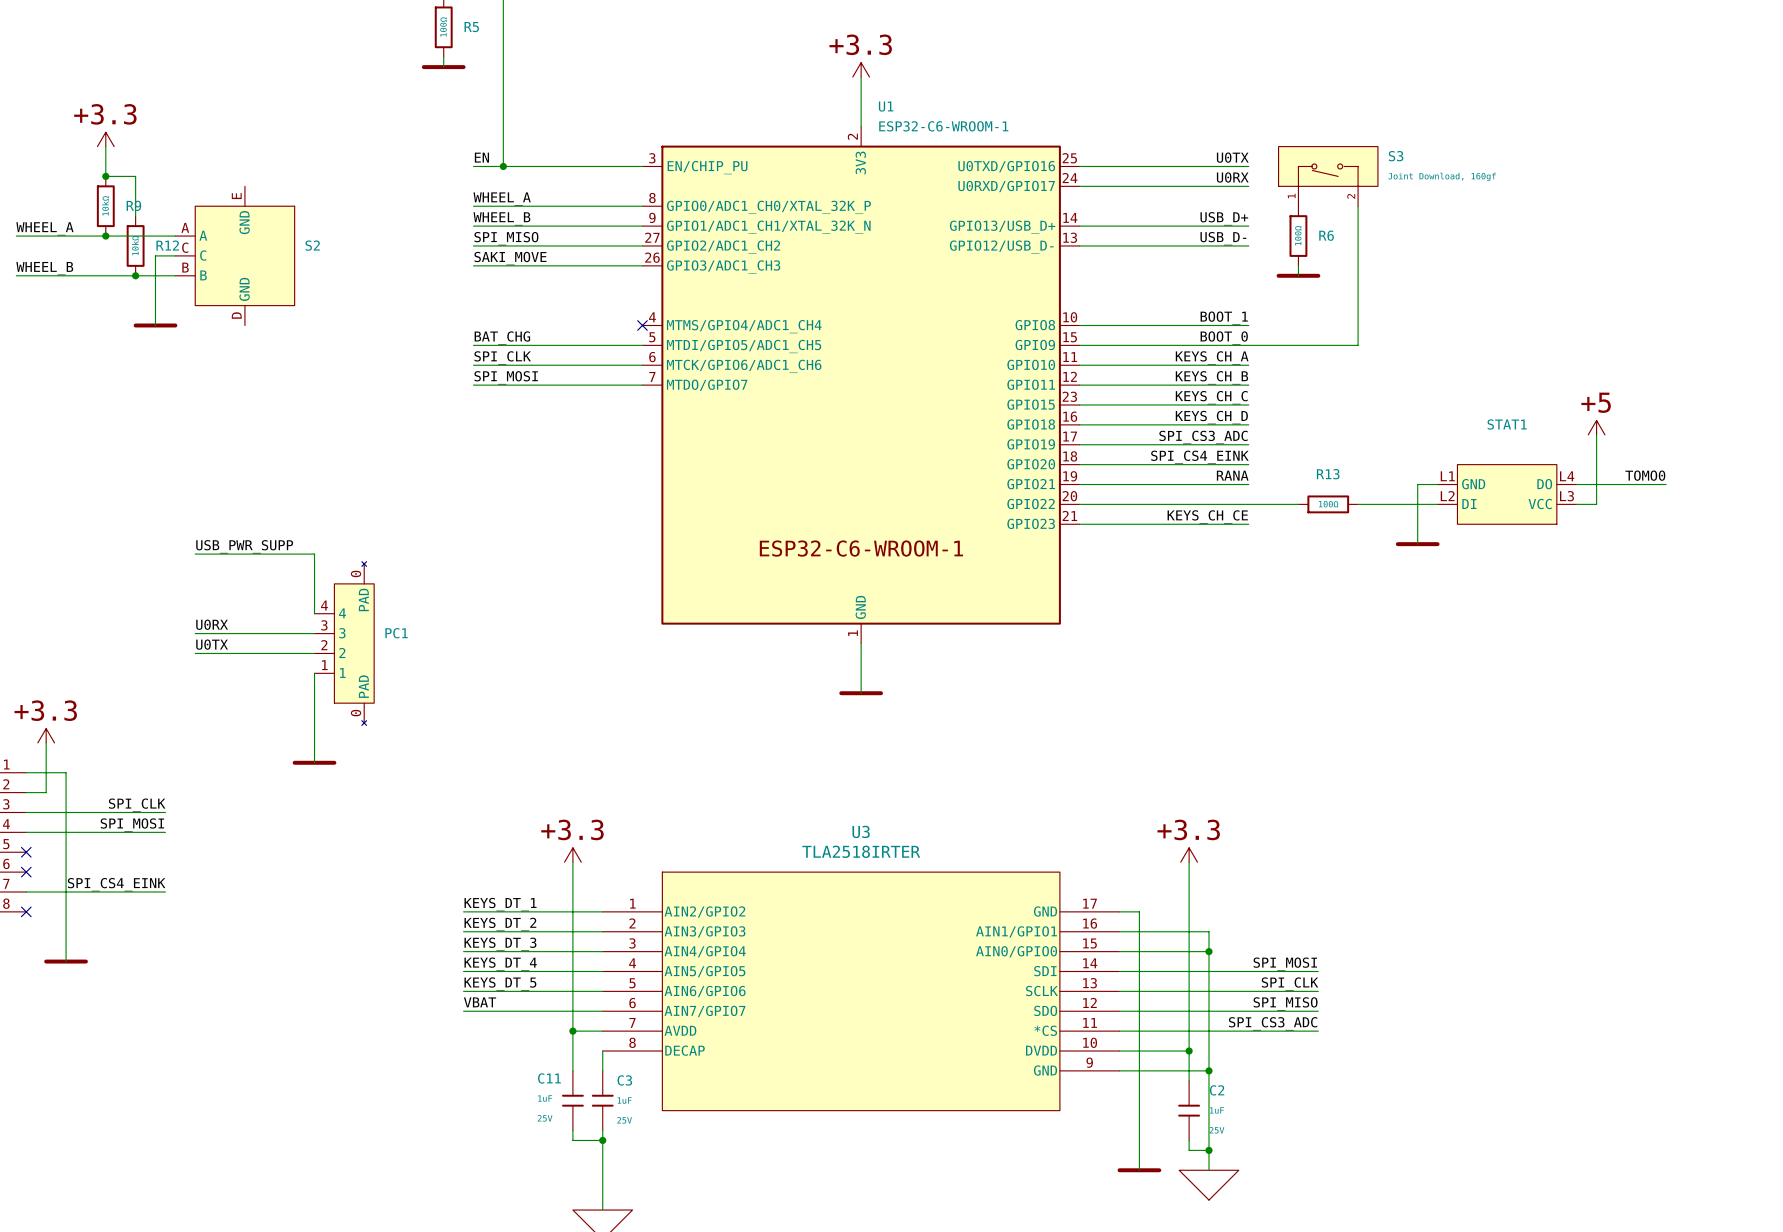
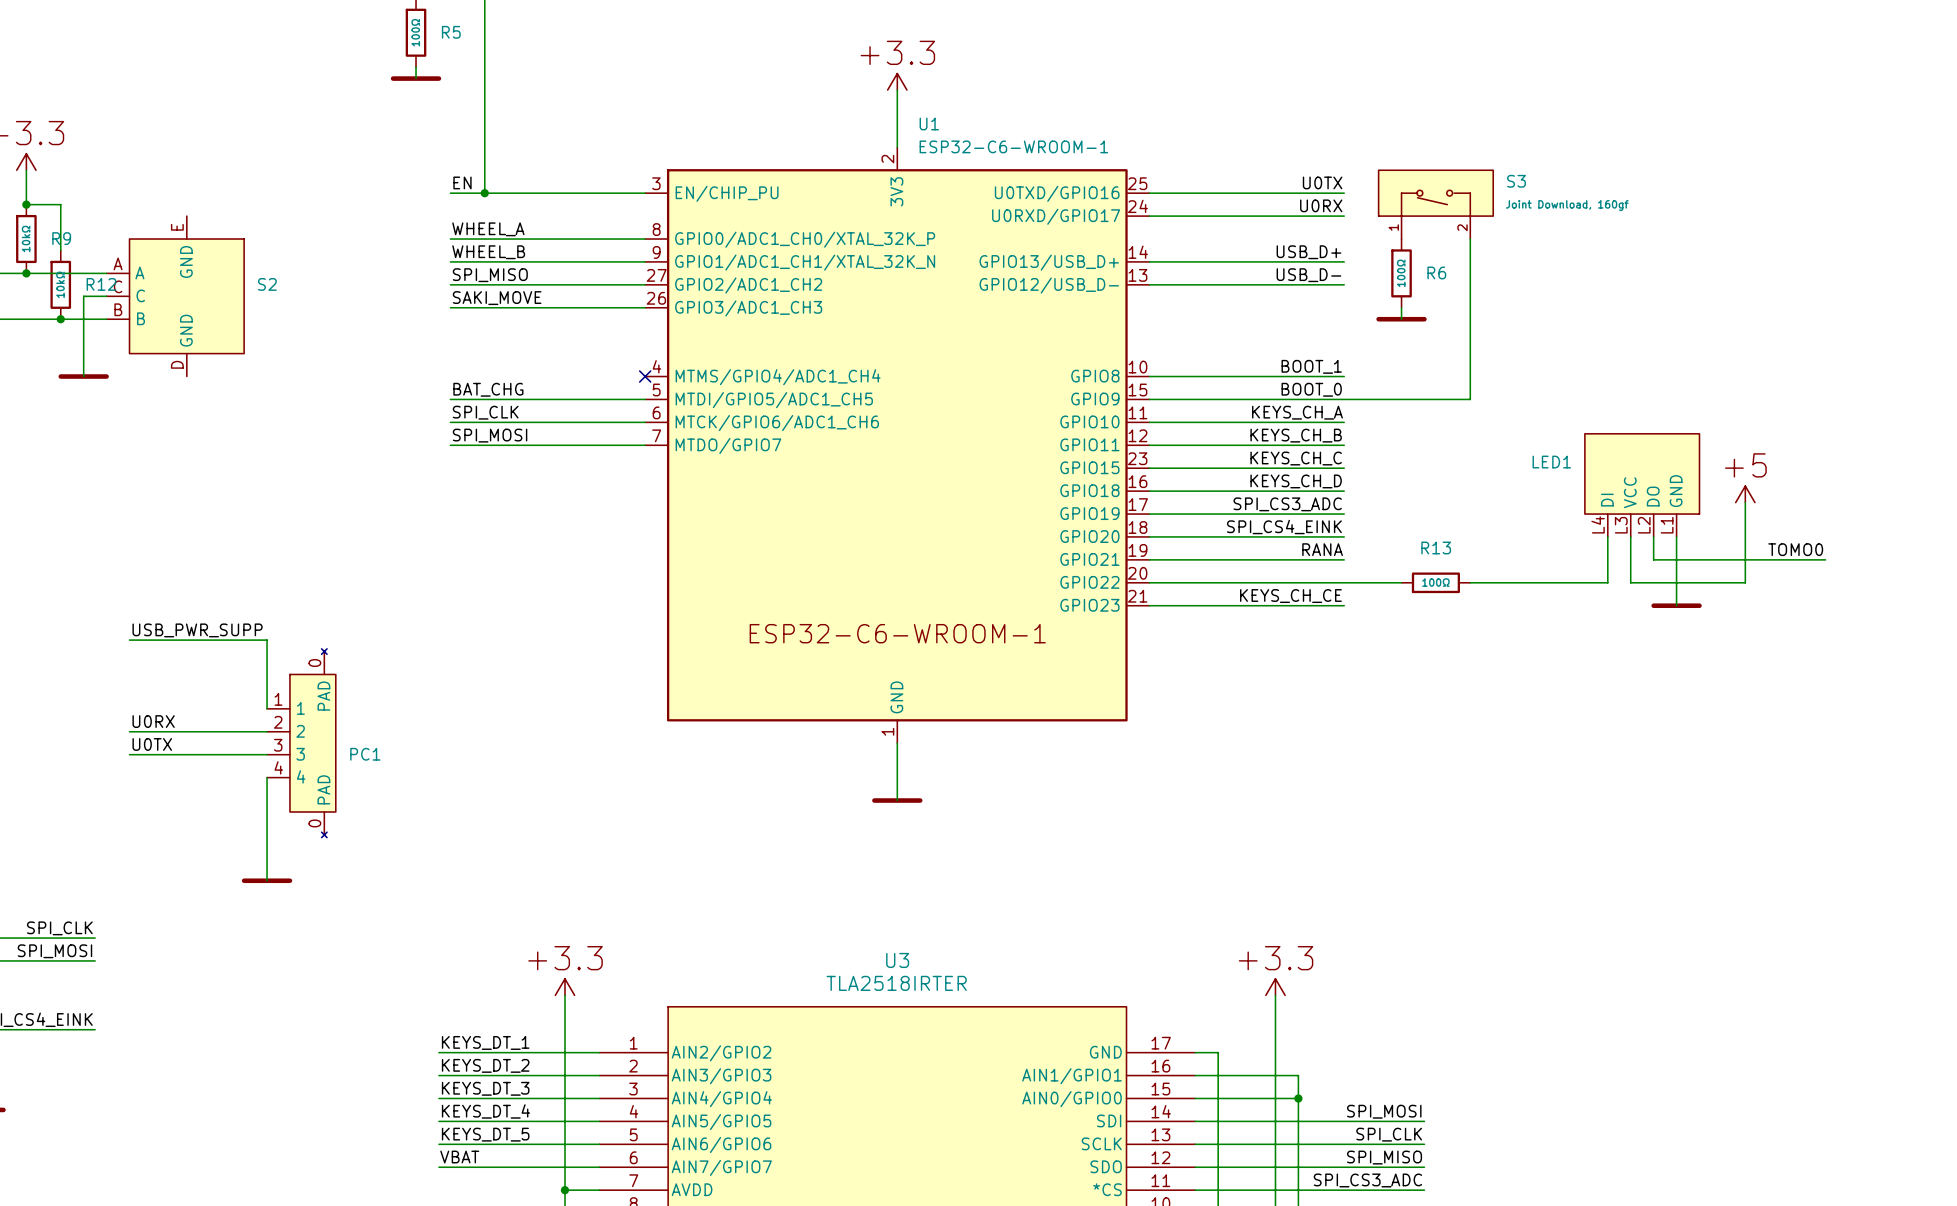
LED1: none -> (1642, 485)
wire: (1437, 484) (1417, 484) (1417, 544) -> none
STAT1: (1507, 494) -> none
power symbol position: (1417, 544) -> (1676, 605)
PC1 flip: as is (354, 643) -> up-down (312, 743)

